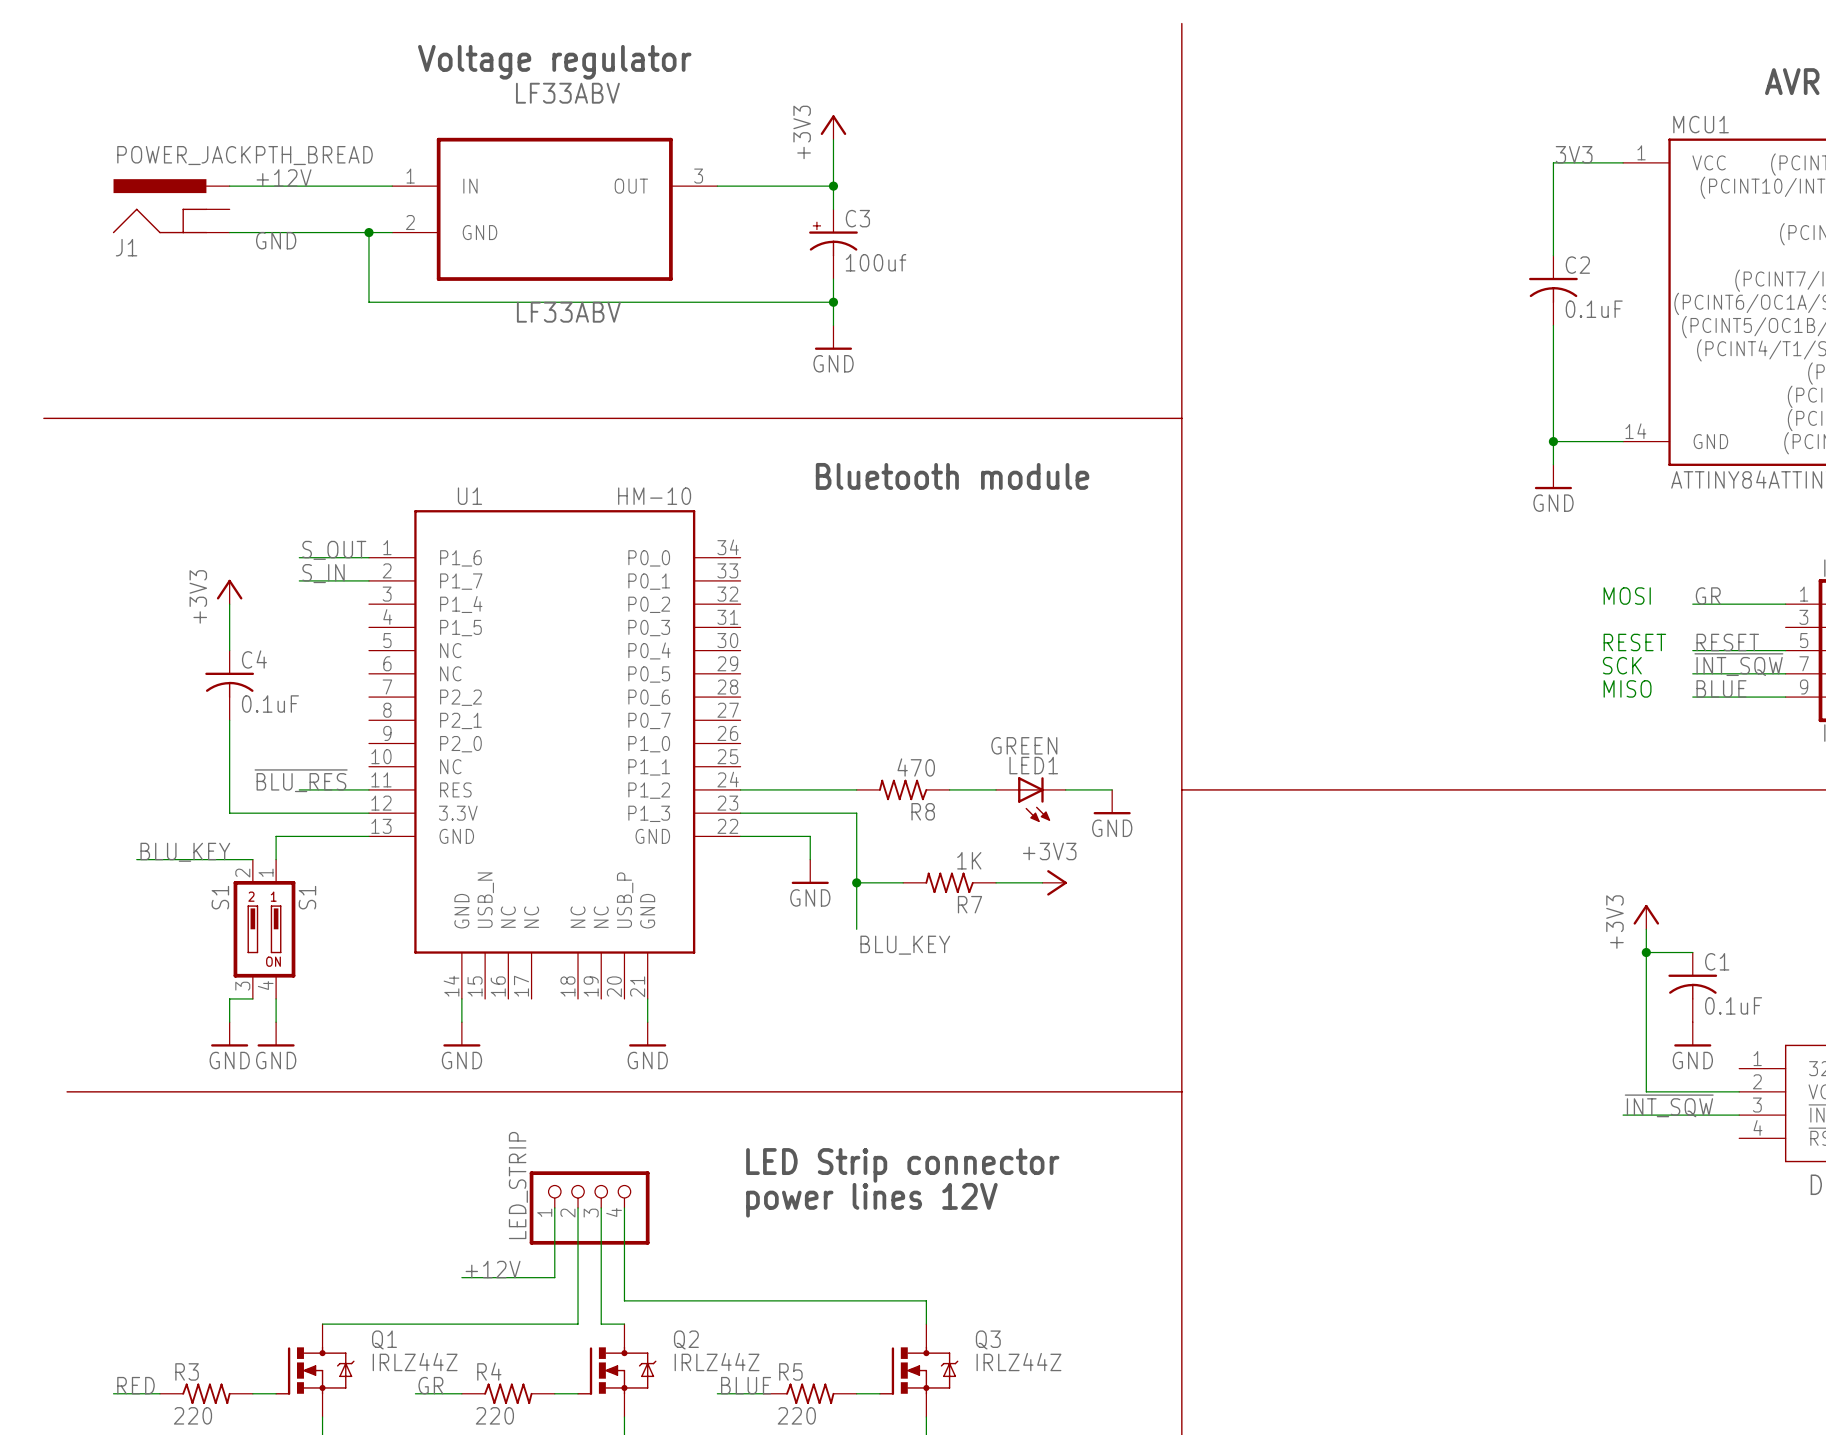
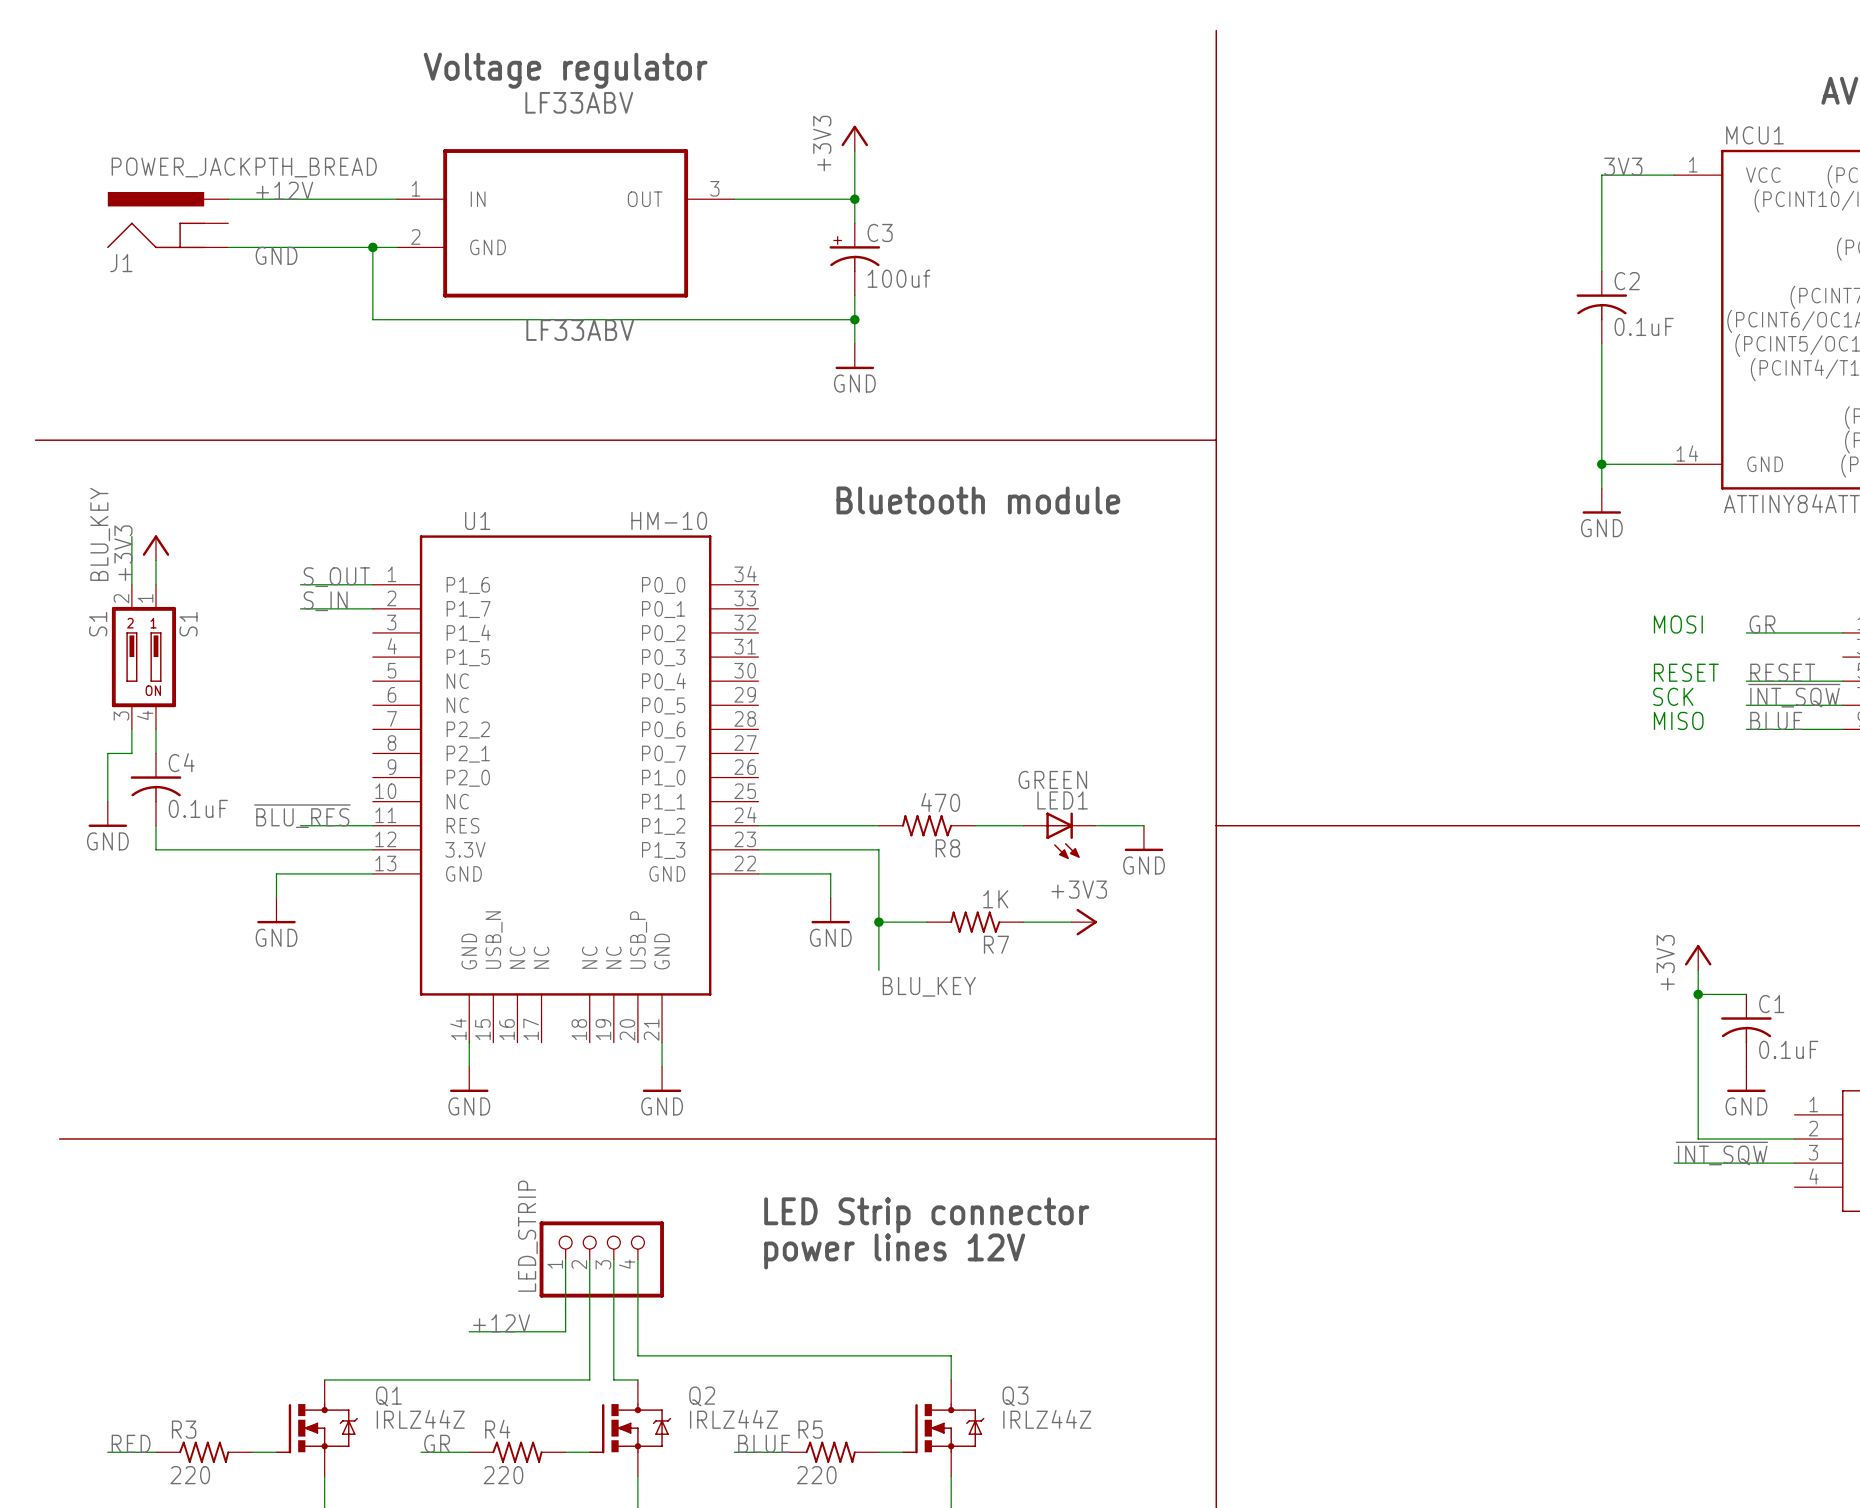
label: none -> BLU_KEY (100, 534)
wire: none -> (155, 560) (155, 584)
power symbol position: +3V3 (229, 591) -> +3V3 (155, 548)
wire: (229, 604) (229, 650) -> (131, 536) (131, 584)
C4 position: (229, 685) -> (155, 789)
wire: none -> (131, 729) (131, 753) (107, 753) (107, 801)
wire: none -> (155, 729) (155, 753)
wire: (229, 720) (229, 813) -> (155, 825) (155, 849) (228, 849)
power symbol: none -> GND (107, 814)
label: BLU_KEY (185, 852) -> none
wire: (136, 859) (252, 859) -> none
power symbol: none -> GND (276, 910)
S1 position: (264, 929) -> (143, 657)
wire: (252, 998) (229, 998) (229, 1022) -> none
wire: (276, 998) (276, 1022) -> none
power symbol: GND (229, 1034) -> none
power symbol: GND (276, 1034) -> none

